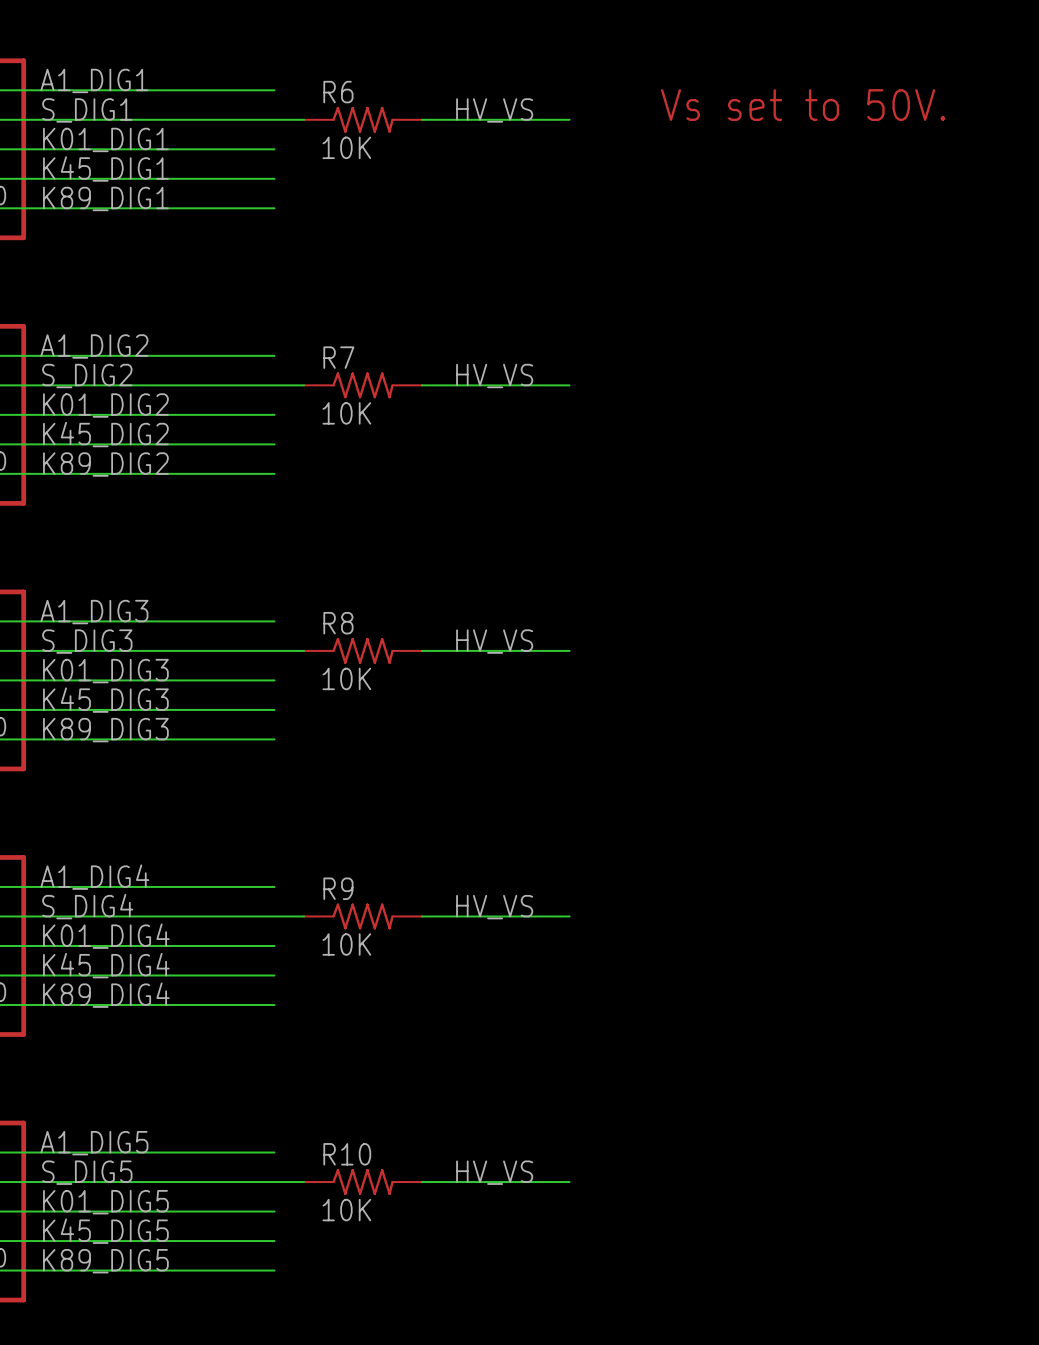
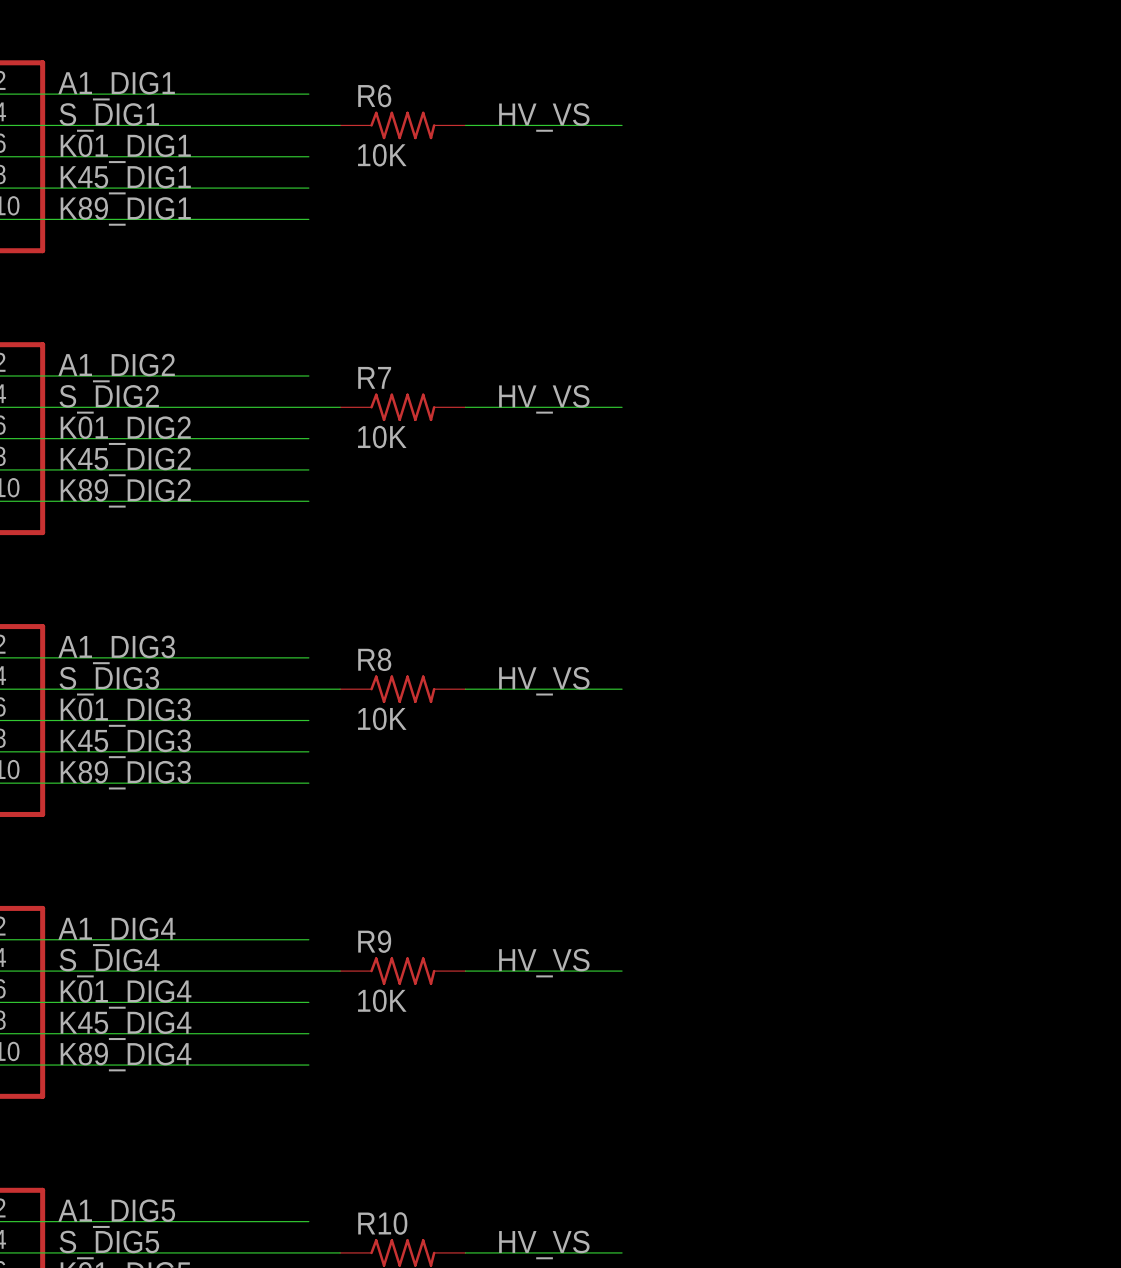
text: Vs set to 50V. (803, 105) -> none

